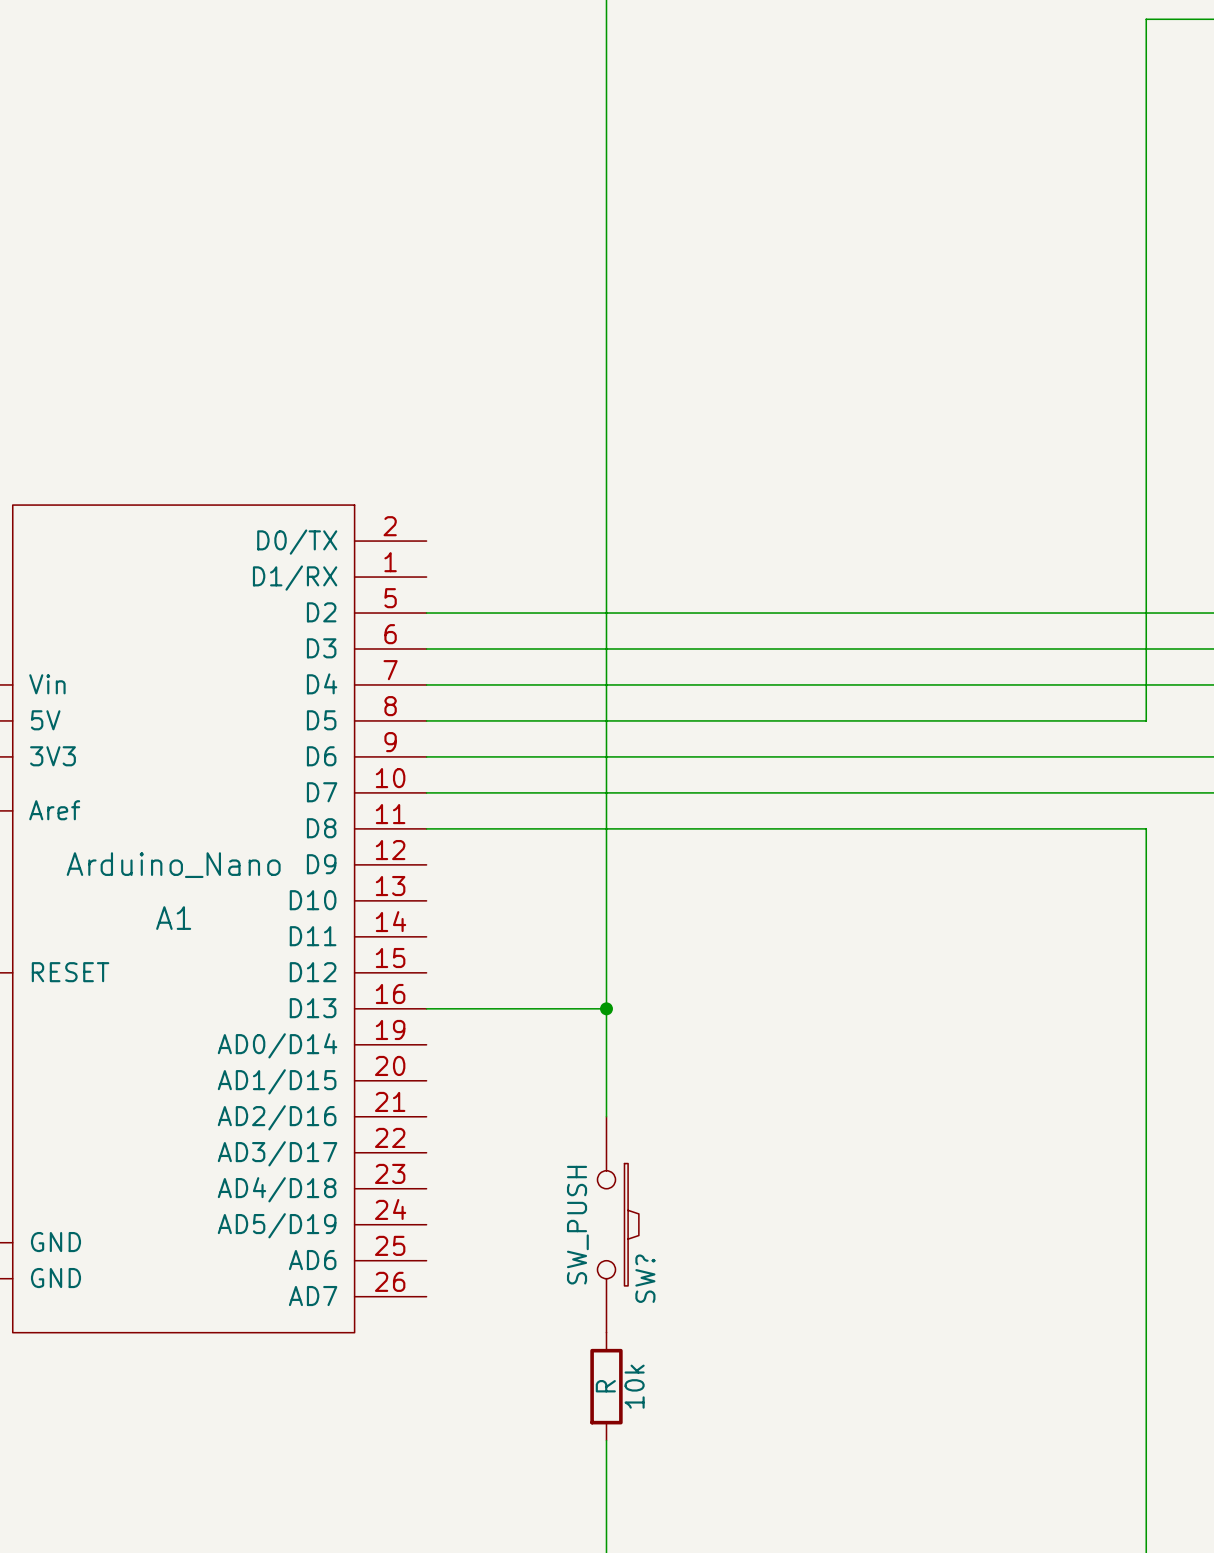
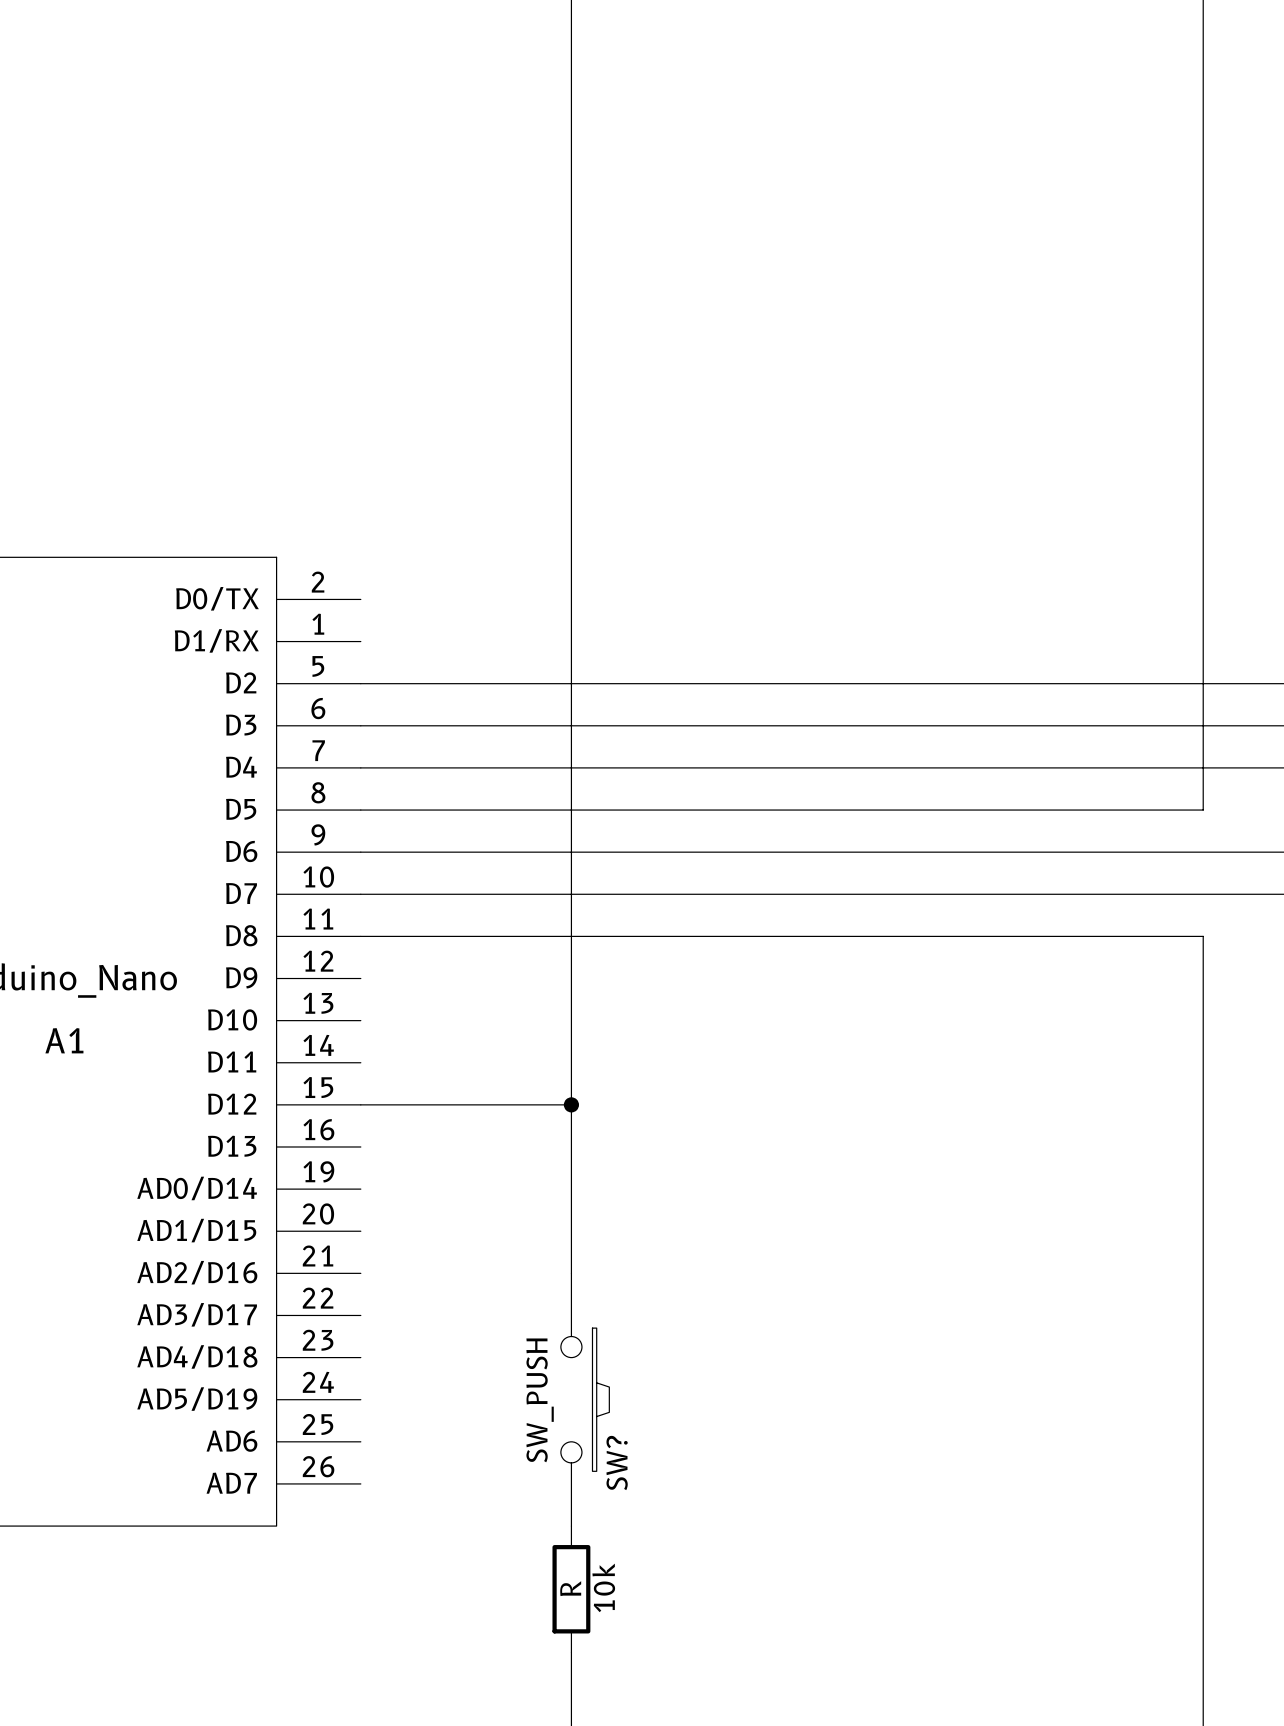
wire: (426, 1008) (606, 1008) -> (360, 1104) (571, 1104)
junction position: (606, 1008) -> (571, 1104)

